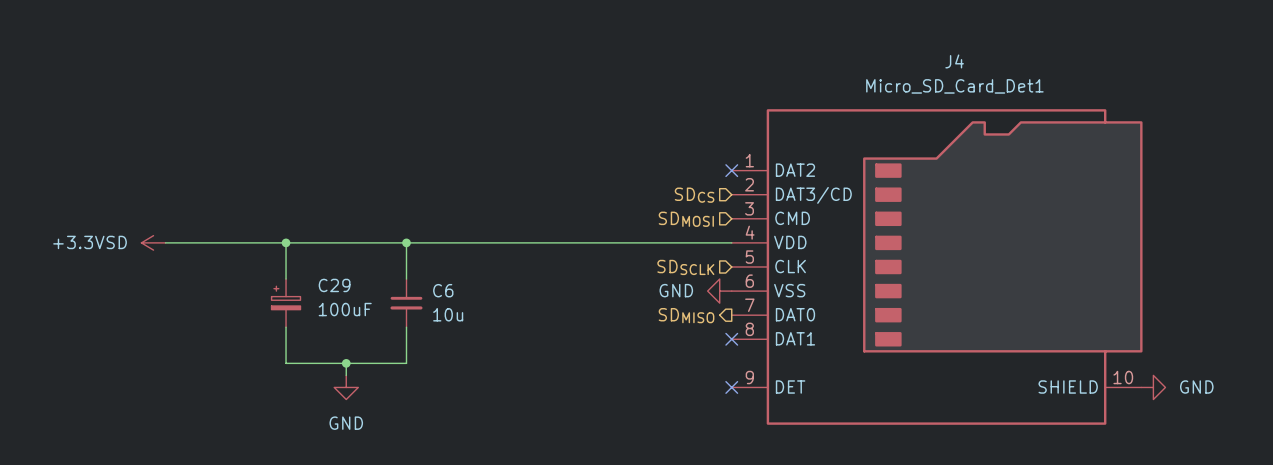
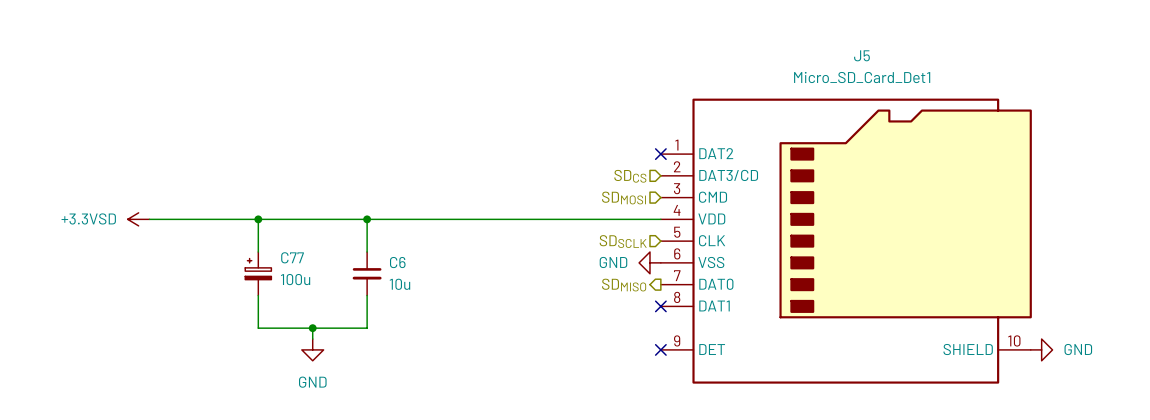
J4 name: J4 (954, 61) -> J5 (861, 55)
C29 name: C29 (334, 285) -> C77 (292, 257)
C29 value: 100uF (345, 309) -> 100u (295, 279)

